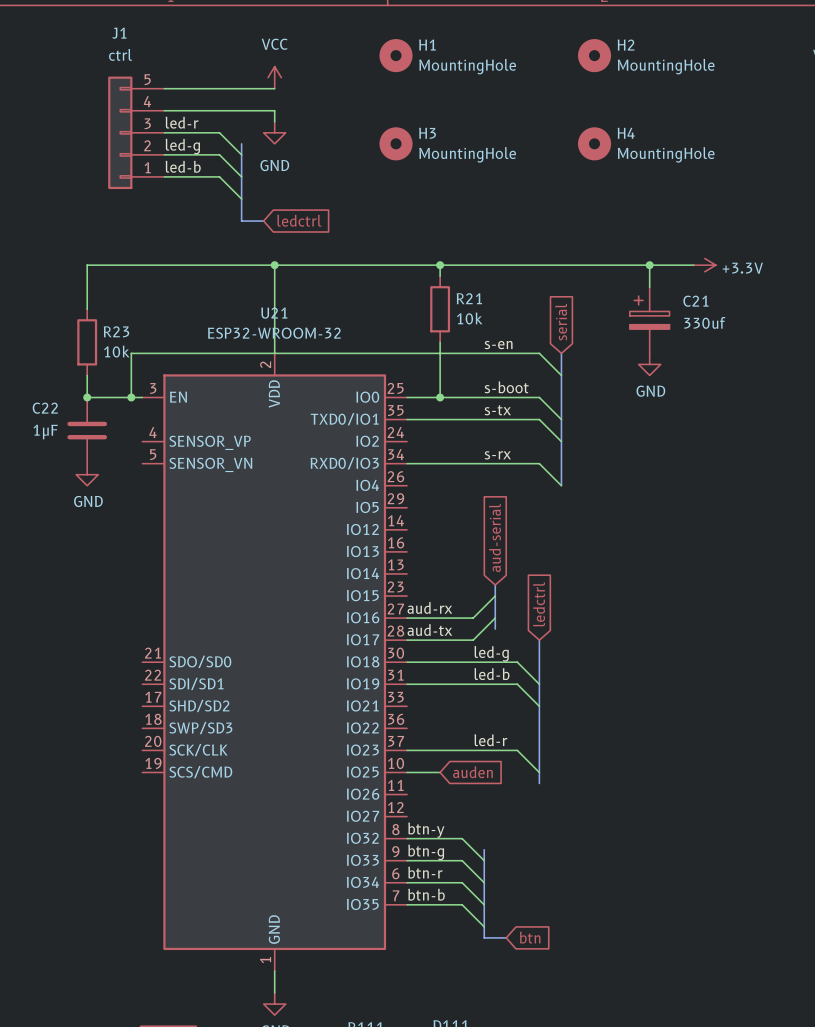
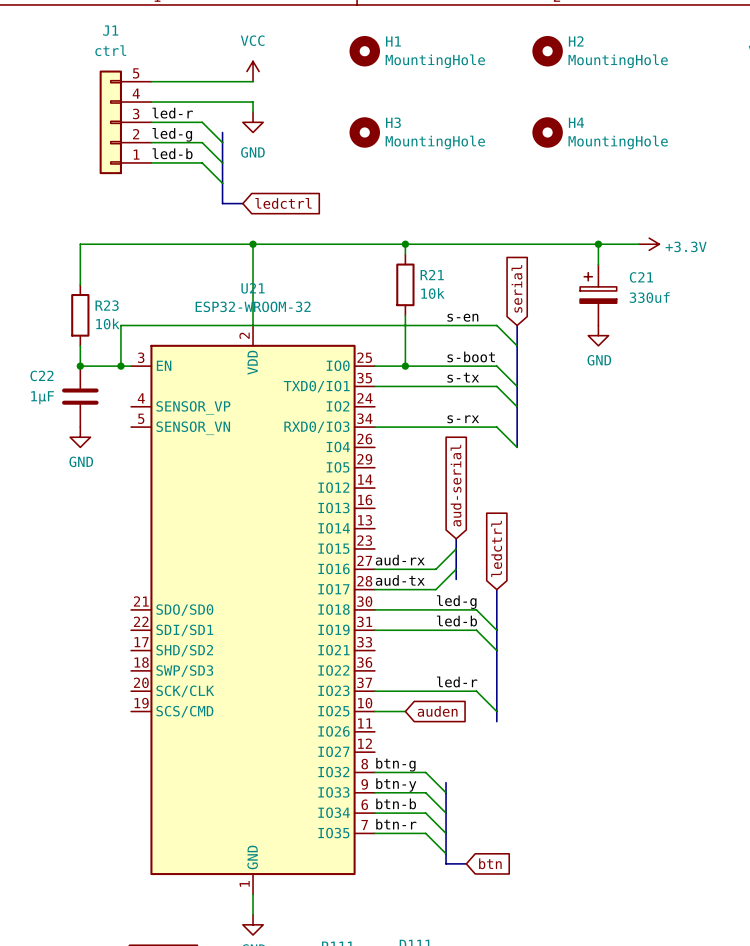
label: btn-y (426, 830) -> btn-g (395, 764)
label: btn-g (426, 852) -> btn-y (396, 784)
label: btn-r (425, 872) -> btn-b (396, 803)
label: btn-b (426, 894) -> btn-r (396, 824)

